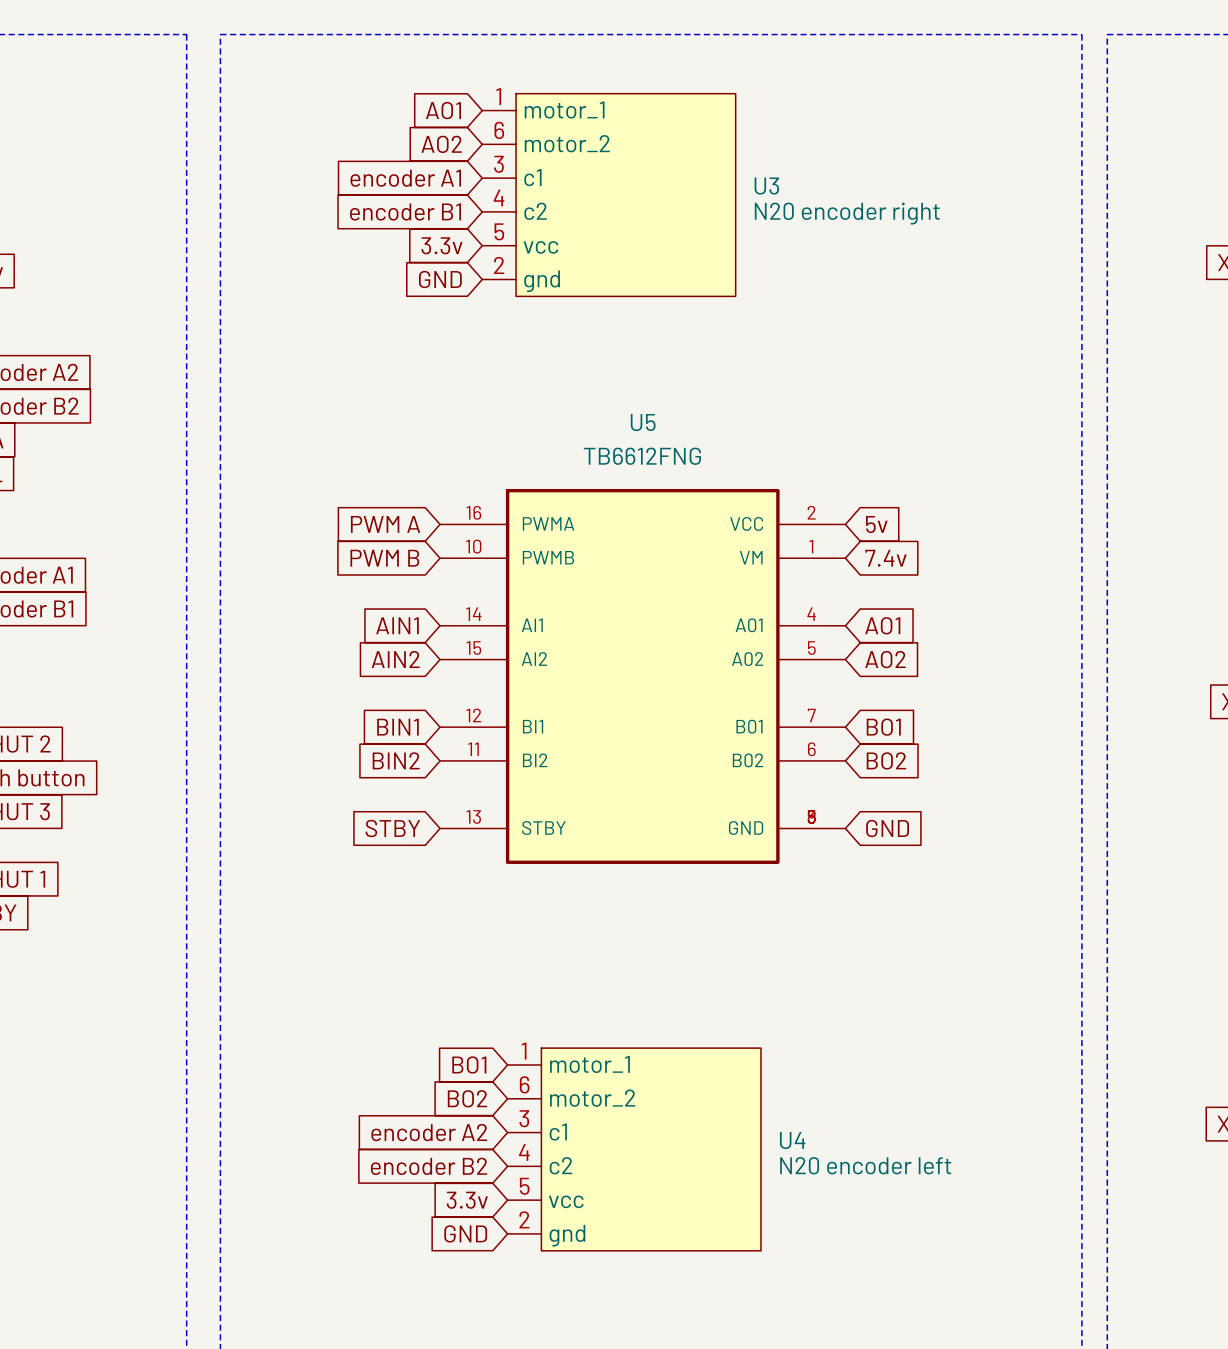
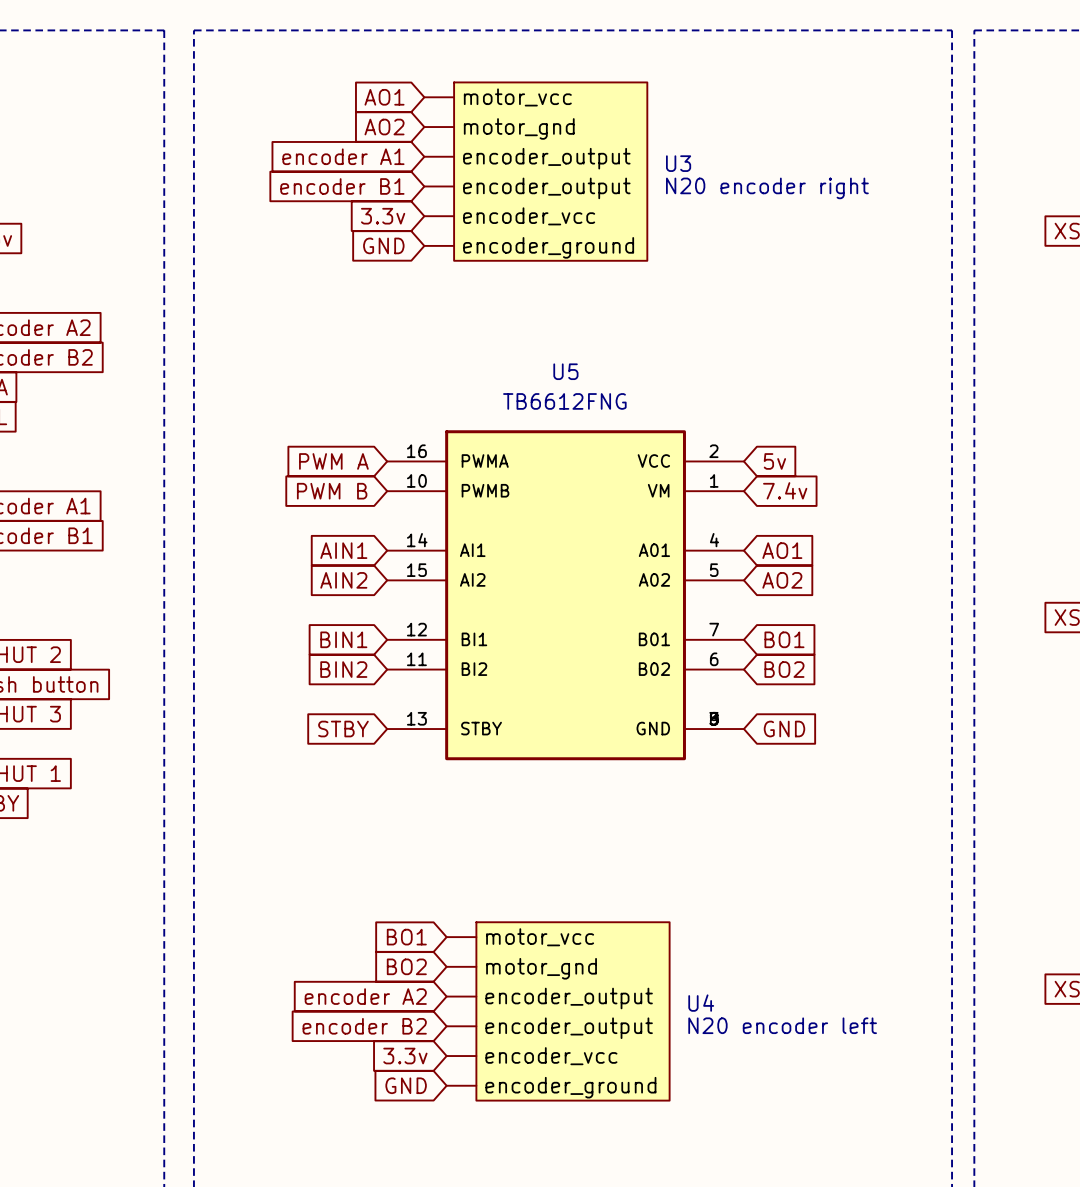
U3 symbol: [482, 93, 736, 297] -> [424, 82, 648, 261]
U4 symbol: [507, 1048, 762, 1251] -> [446, 922, 670, 1101]

